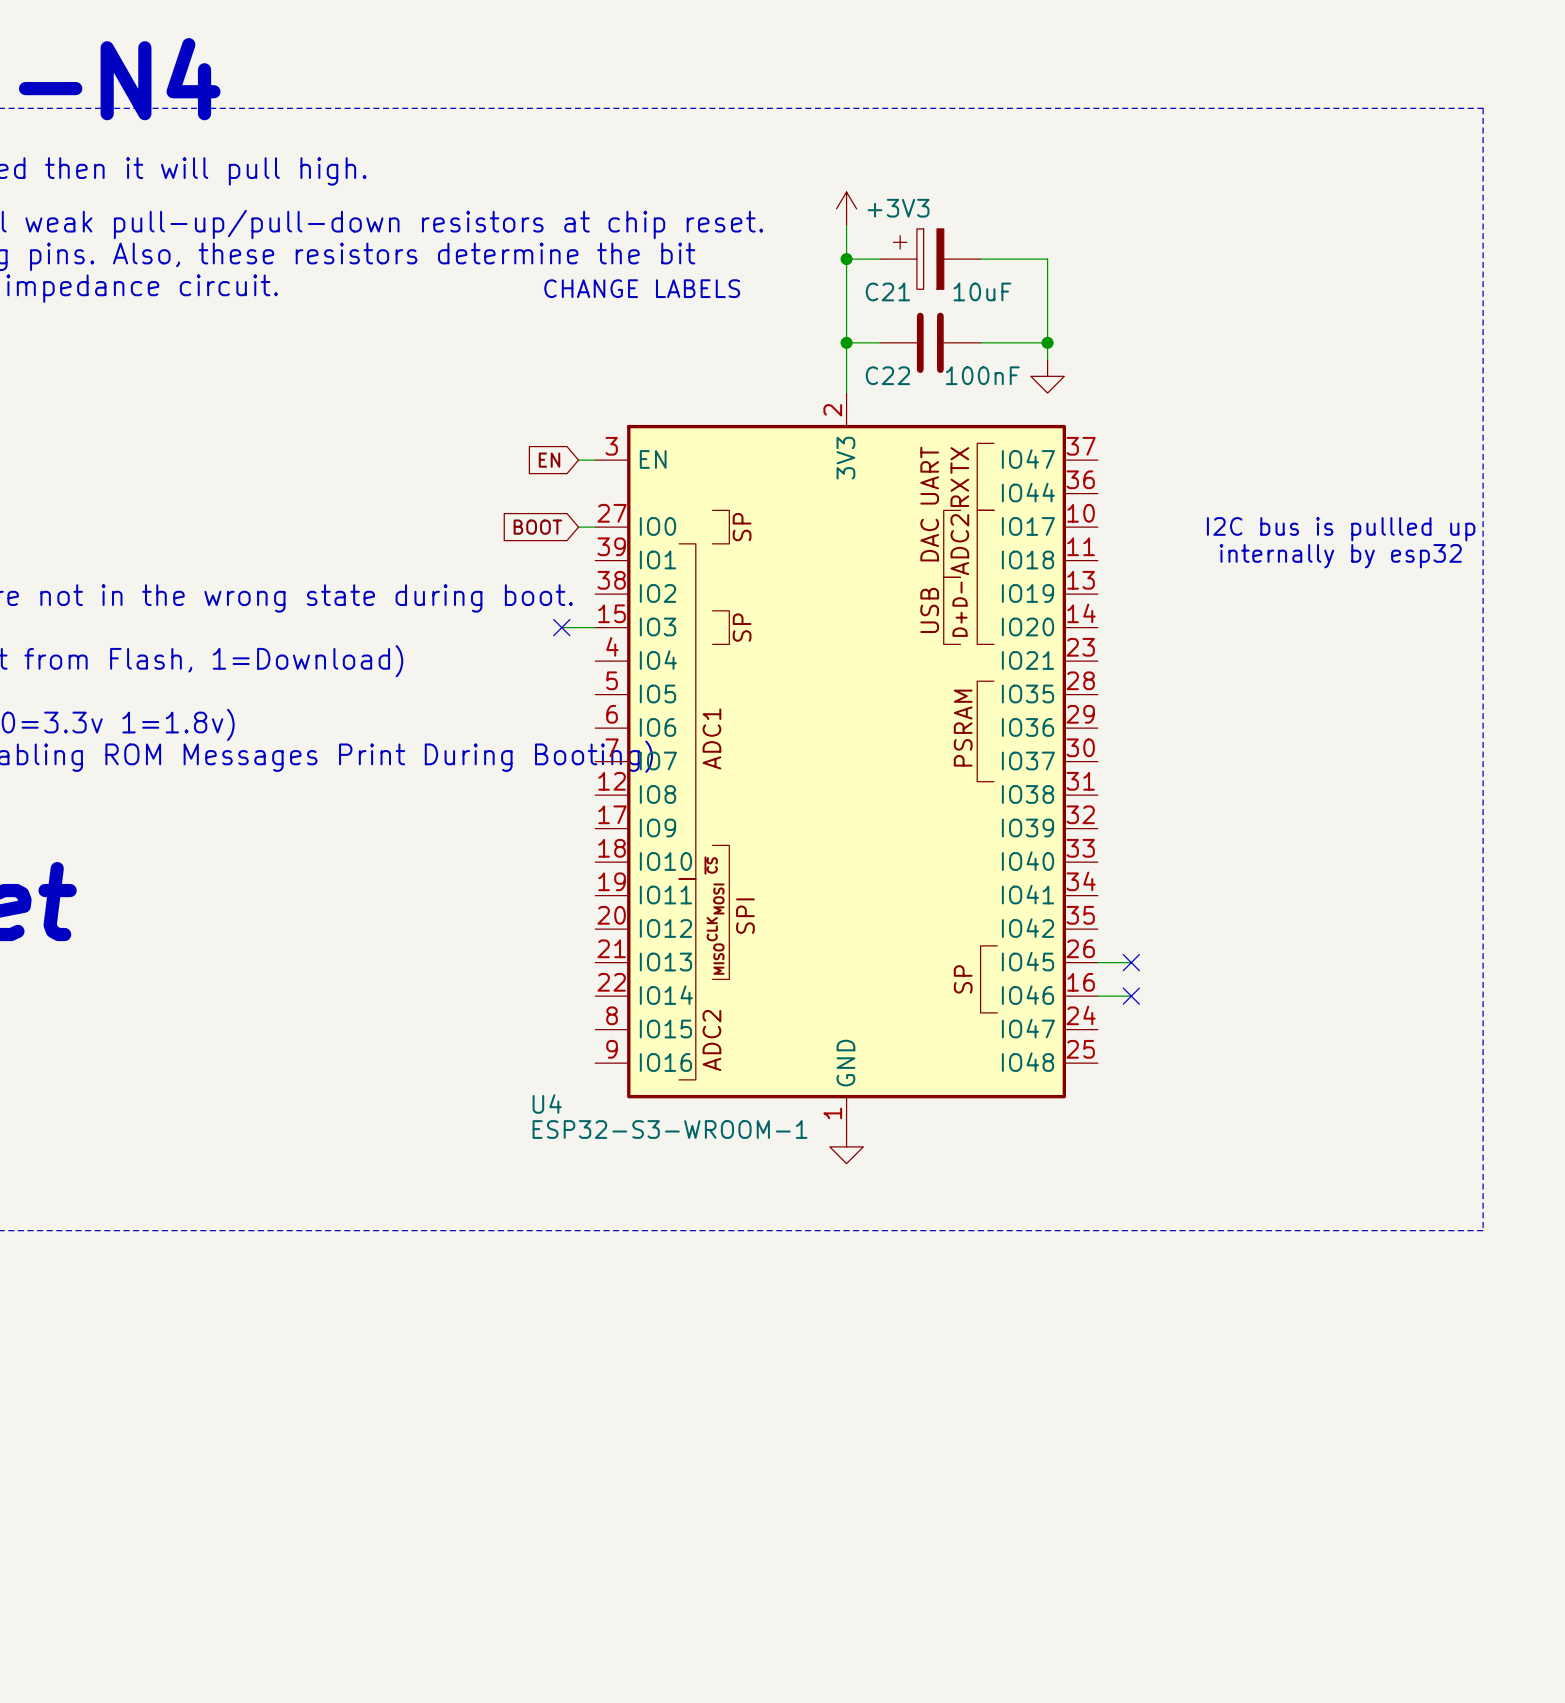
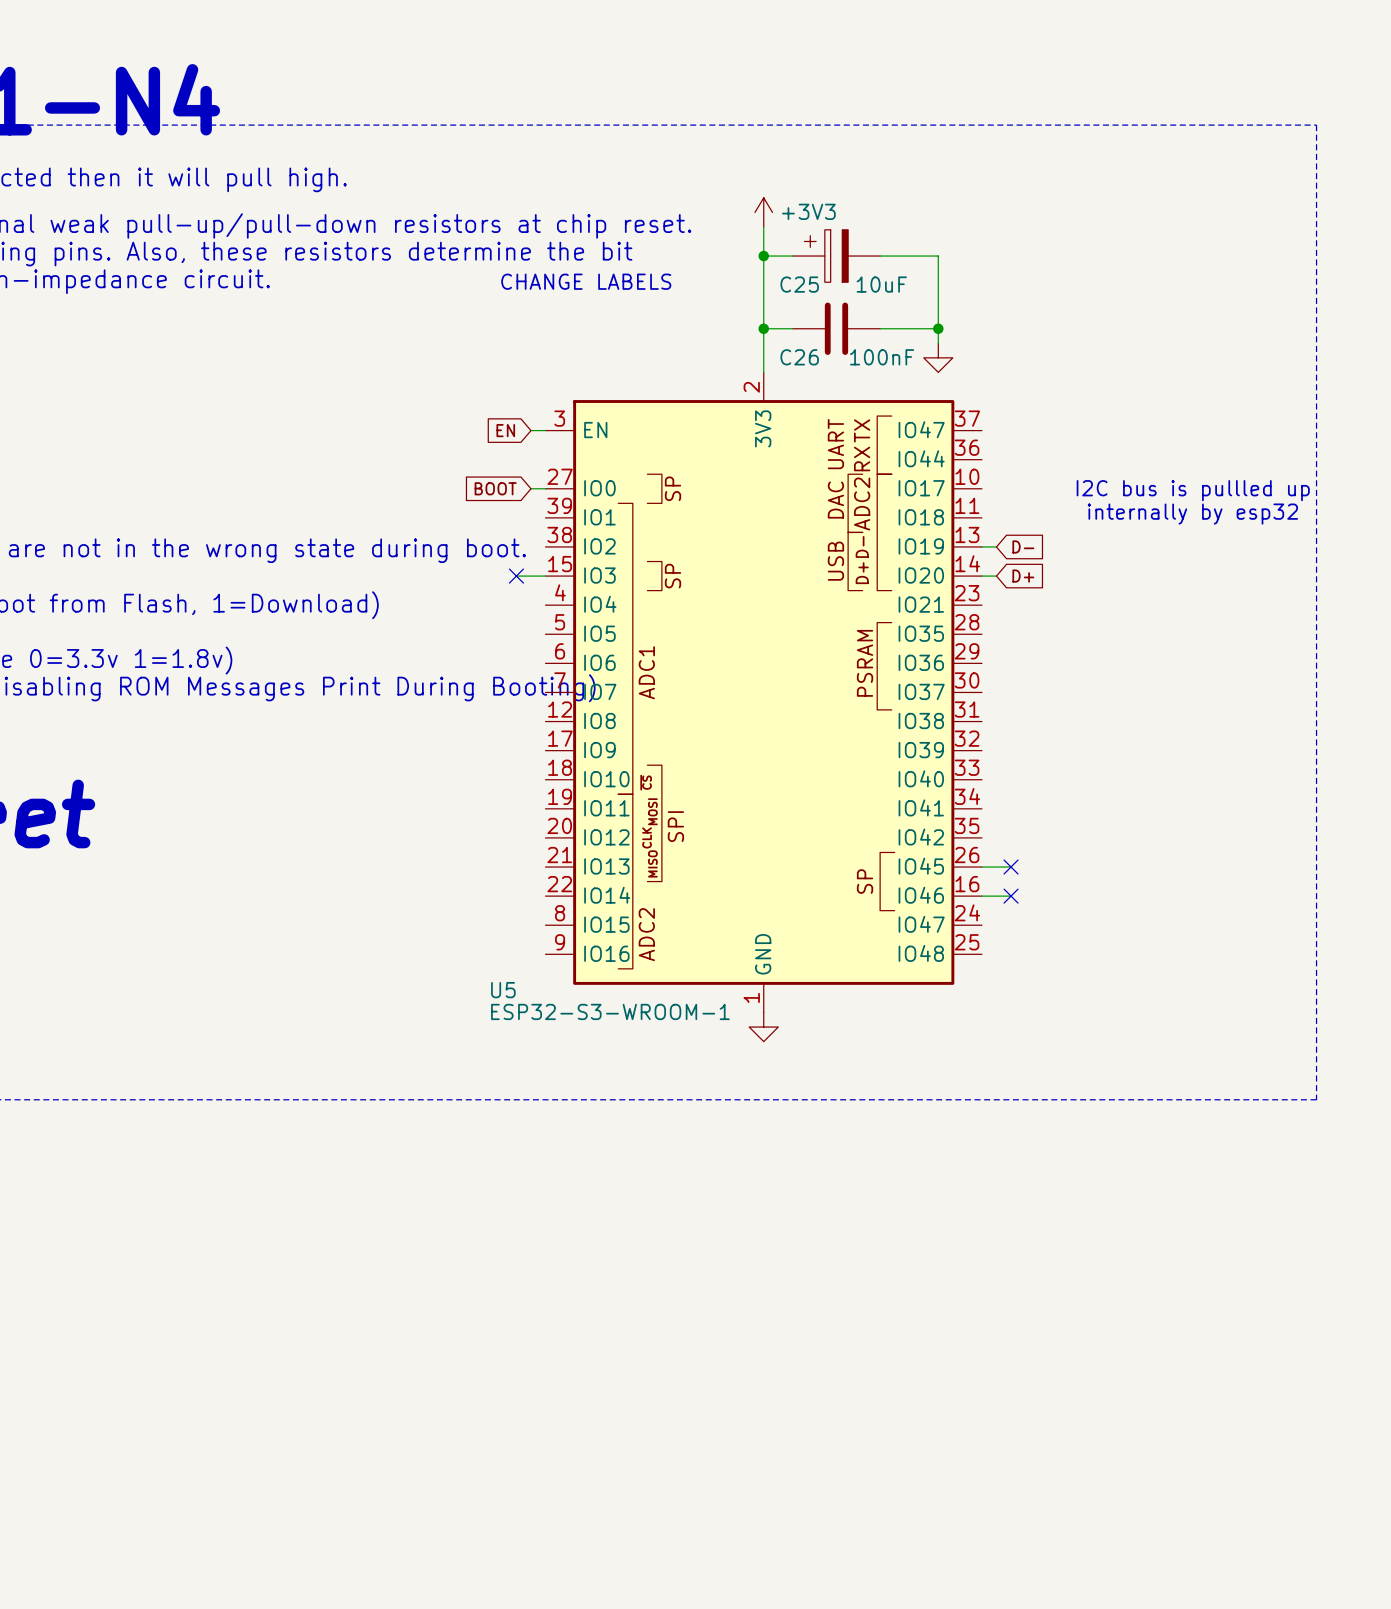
C21 name: C21 (887, 291) -> C25 (799, 284)
C22 name: C22 (887, 375) -> C26 (799, 357)
wire: none -> (981, 546) (996, 546)
global label: none -> D- (1023, 546)
wire: none -> (981, 576) (996, 576)
global label: none -> D+ (1023, 576)
U4 name: U4 (547, 1103) -> U5 (503, 990)

